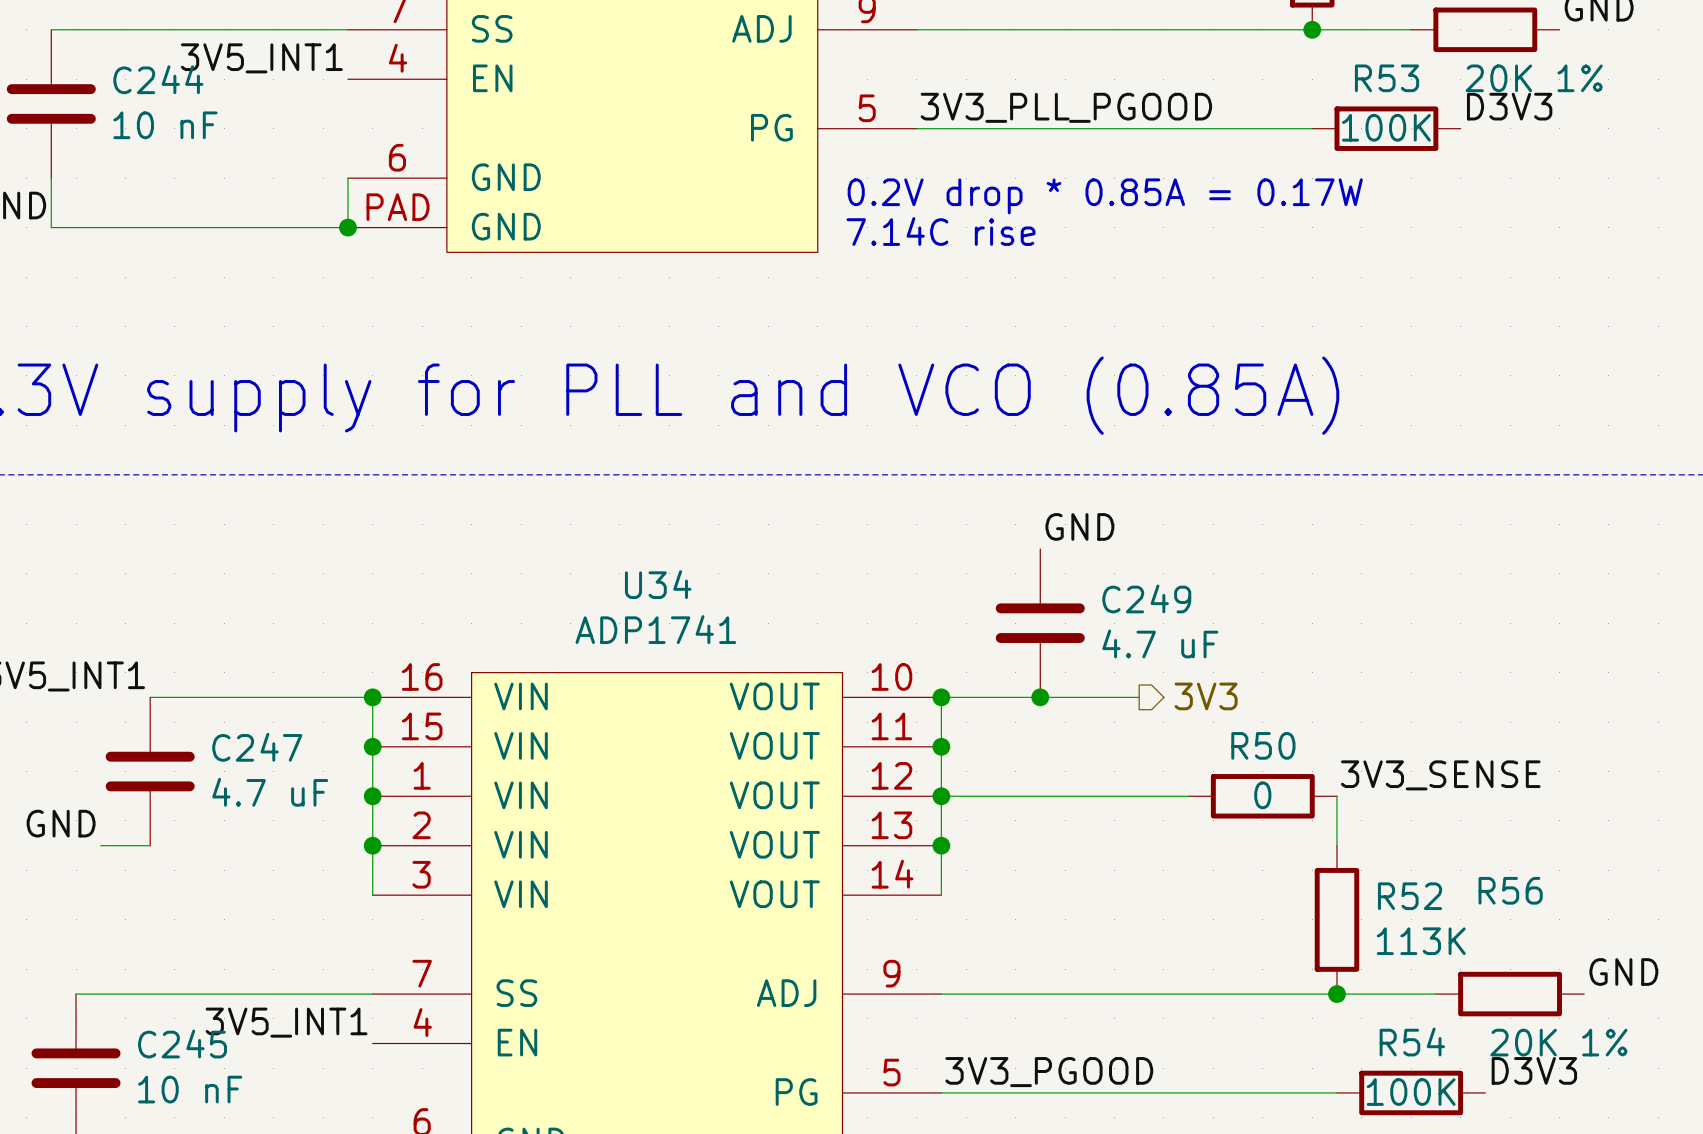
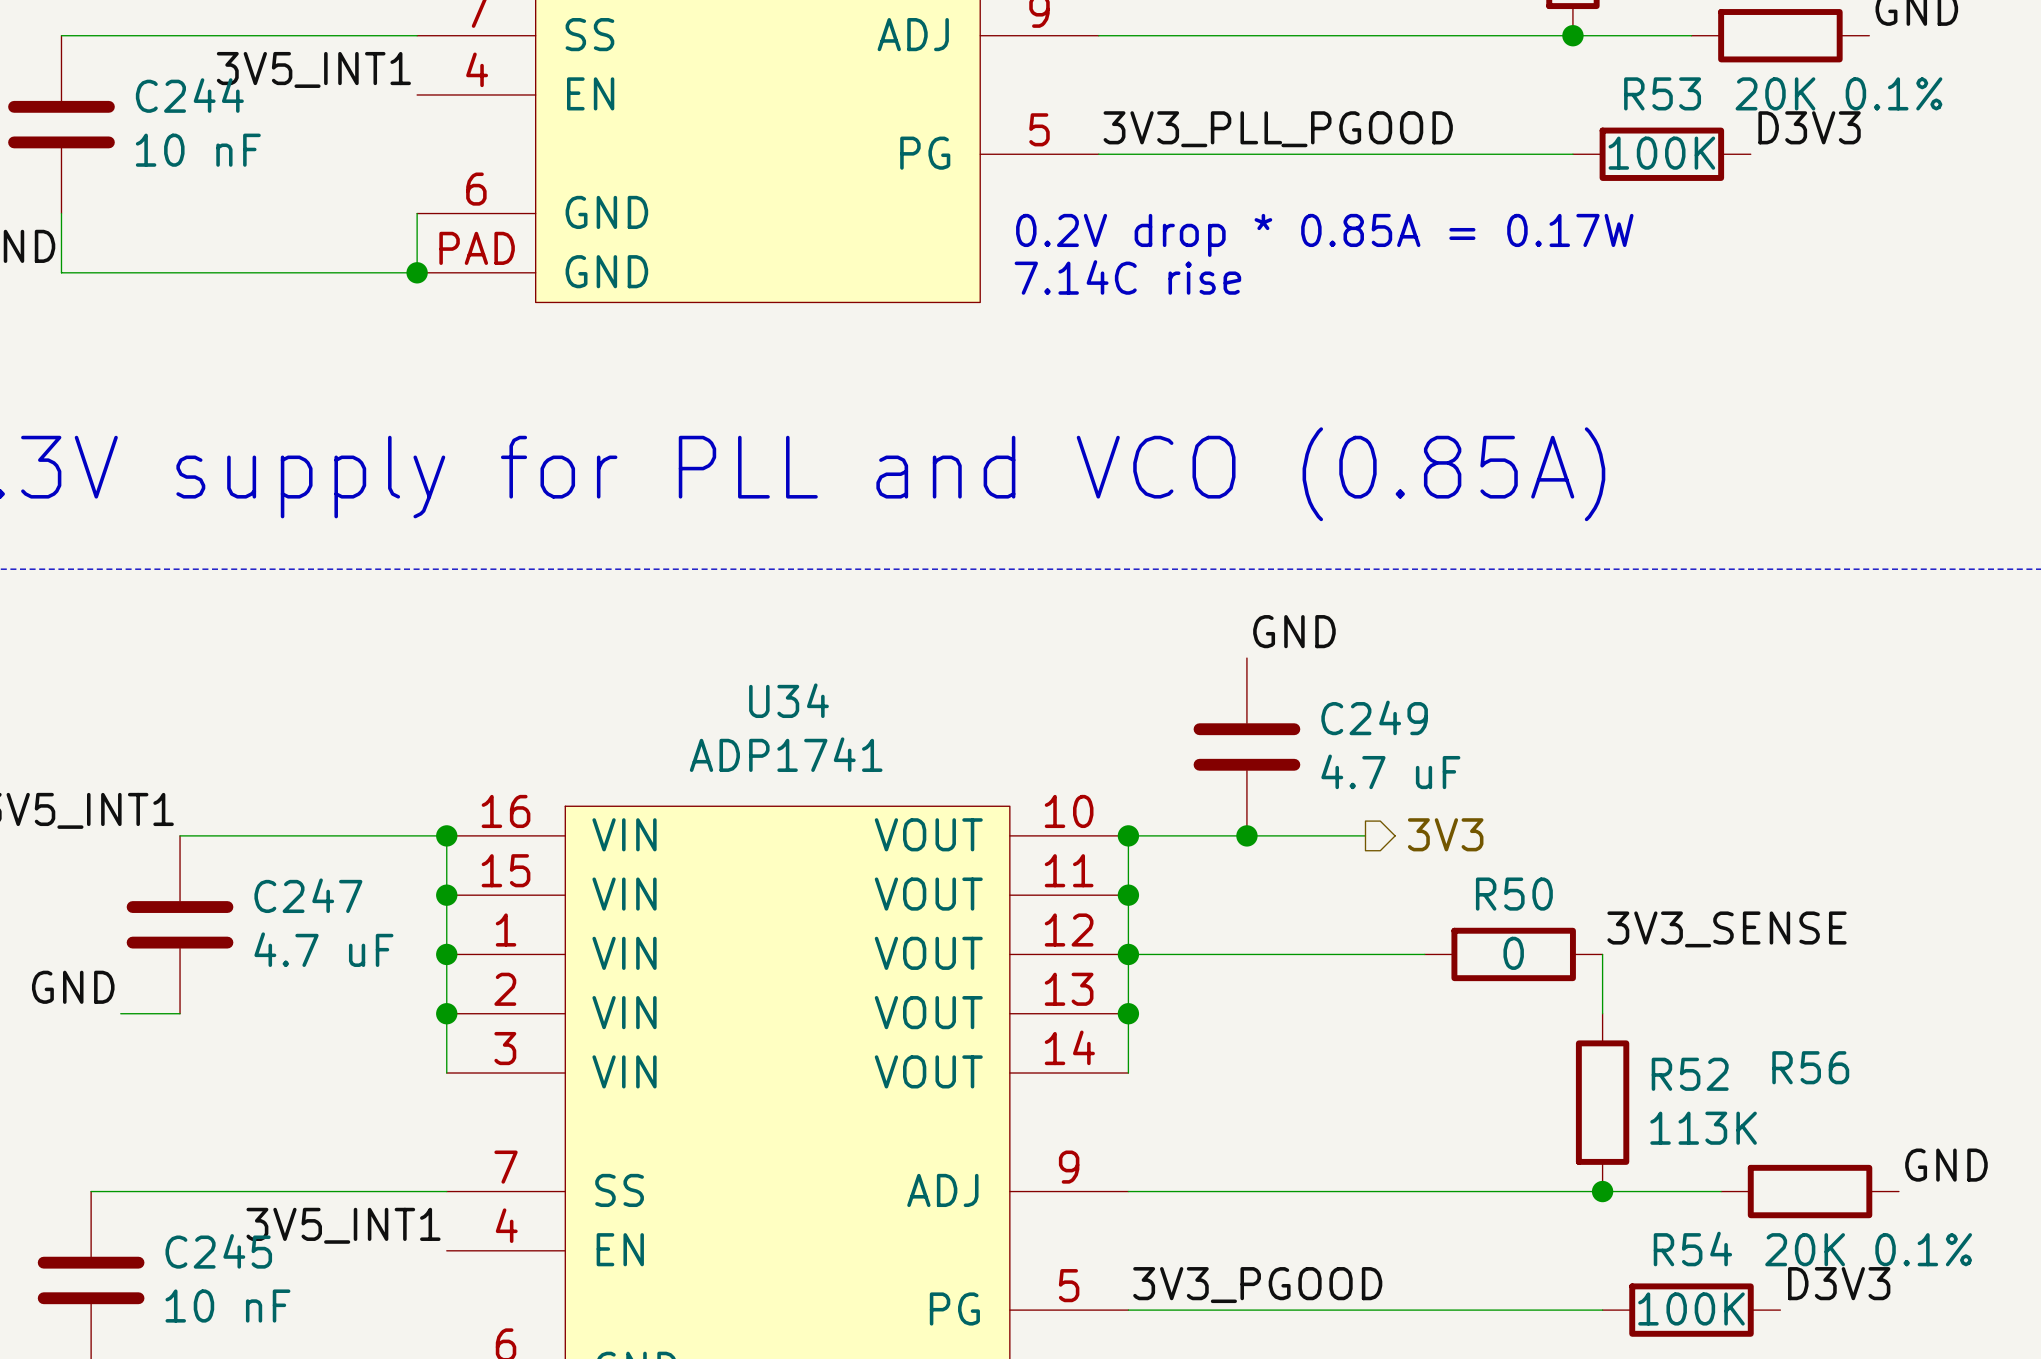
part value: 20K 1% (1534, 78) -> 20K 0.1% (1838, 93)
R56 value: 20K 1% (1558, 1042) -> 20K 0.1% (1868, 1249)

